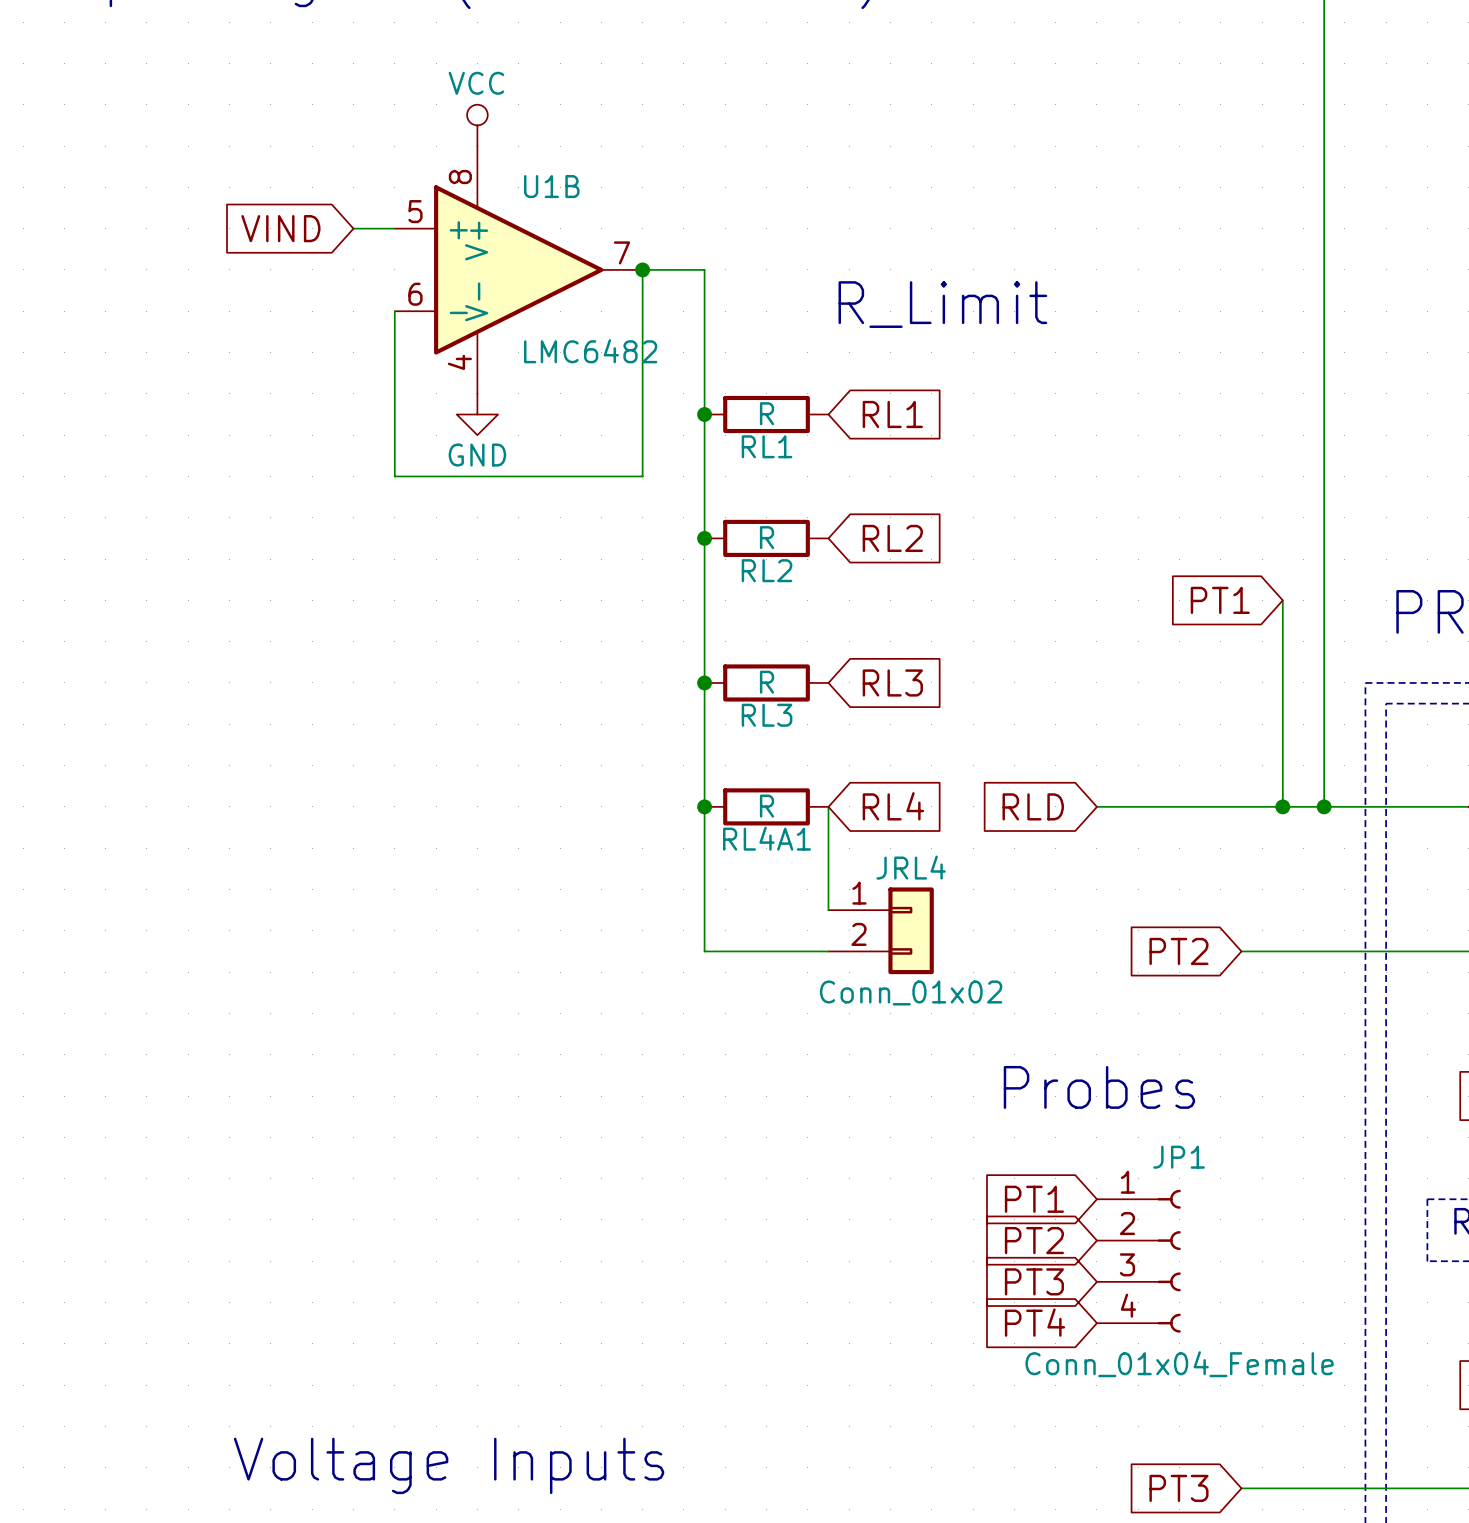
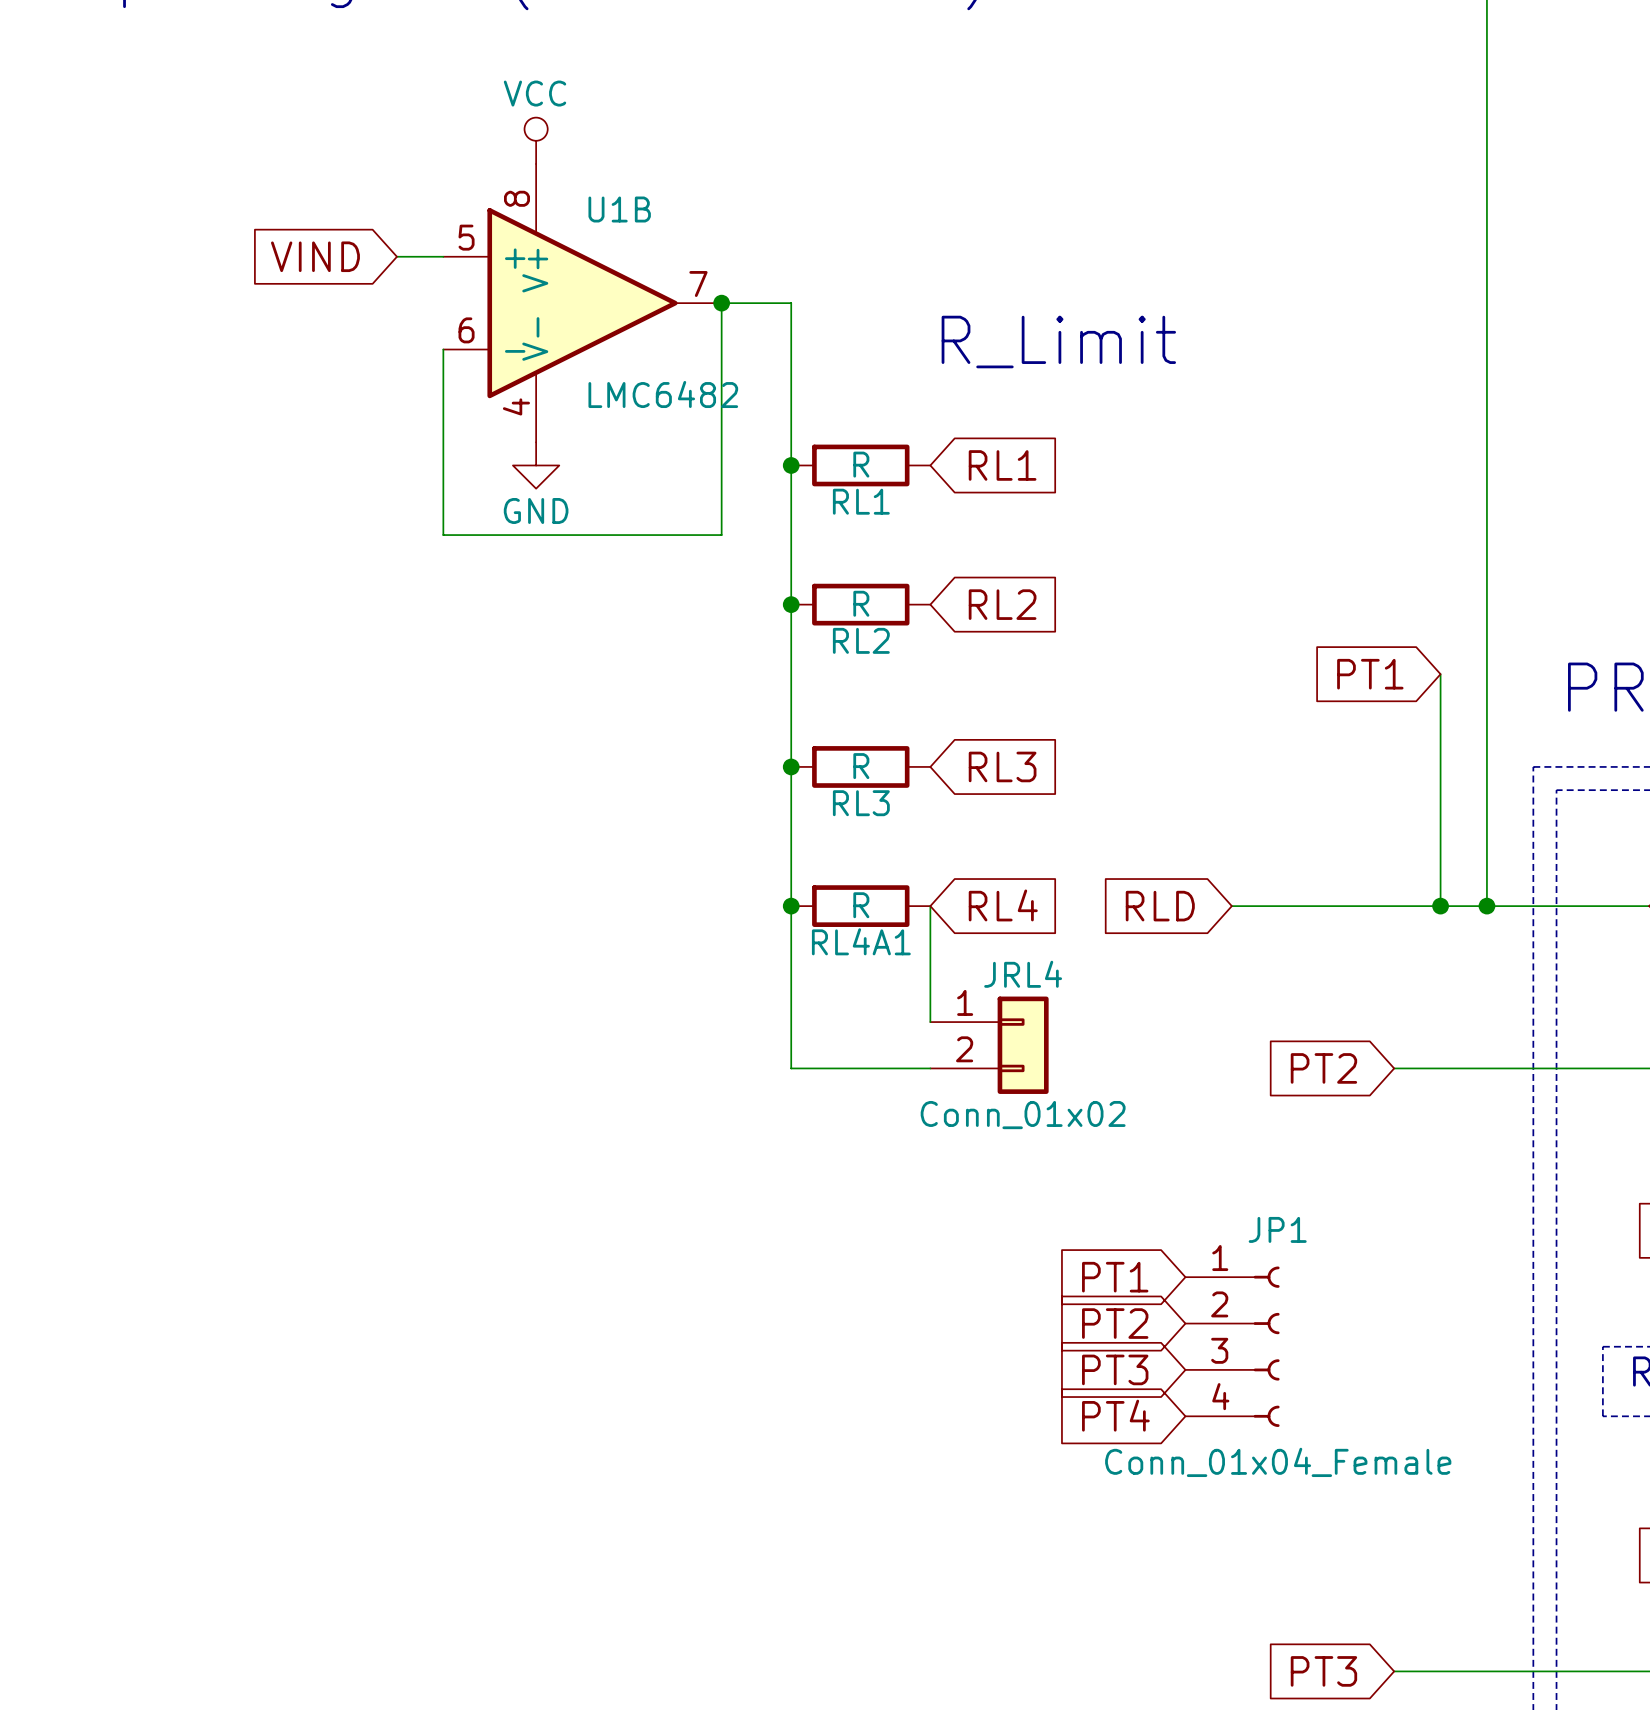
text: Probes (1099, 1087) -> none
global label position: PT1 (1034, 1199) -> PT1 (1115, 1277)
global label position: PT2 (1034, 1240) -> PT2 (1115, 1323)
JP1 position: (1138, 1261) -> (1232, 1346)
global label position: PT3 (1034, 1281) -> PT3 (1115, 1369)
global label position: PT4 (1035, 1322) -> PT4 (1115, 1415)
text: Voltage Inputs (449, 1465) -> none

